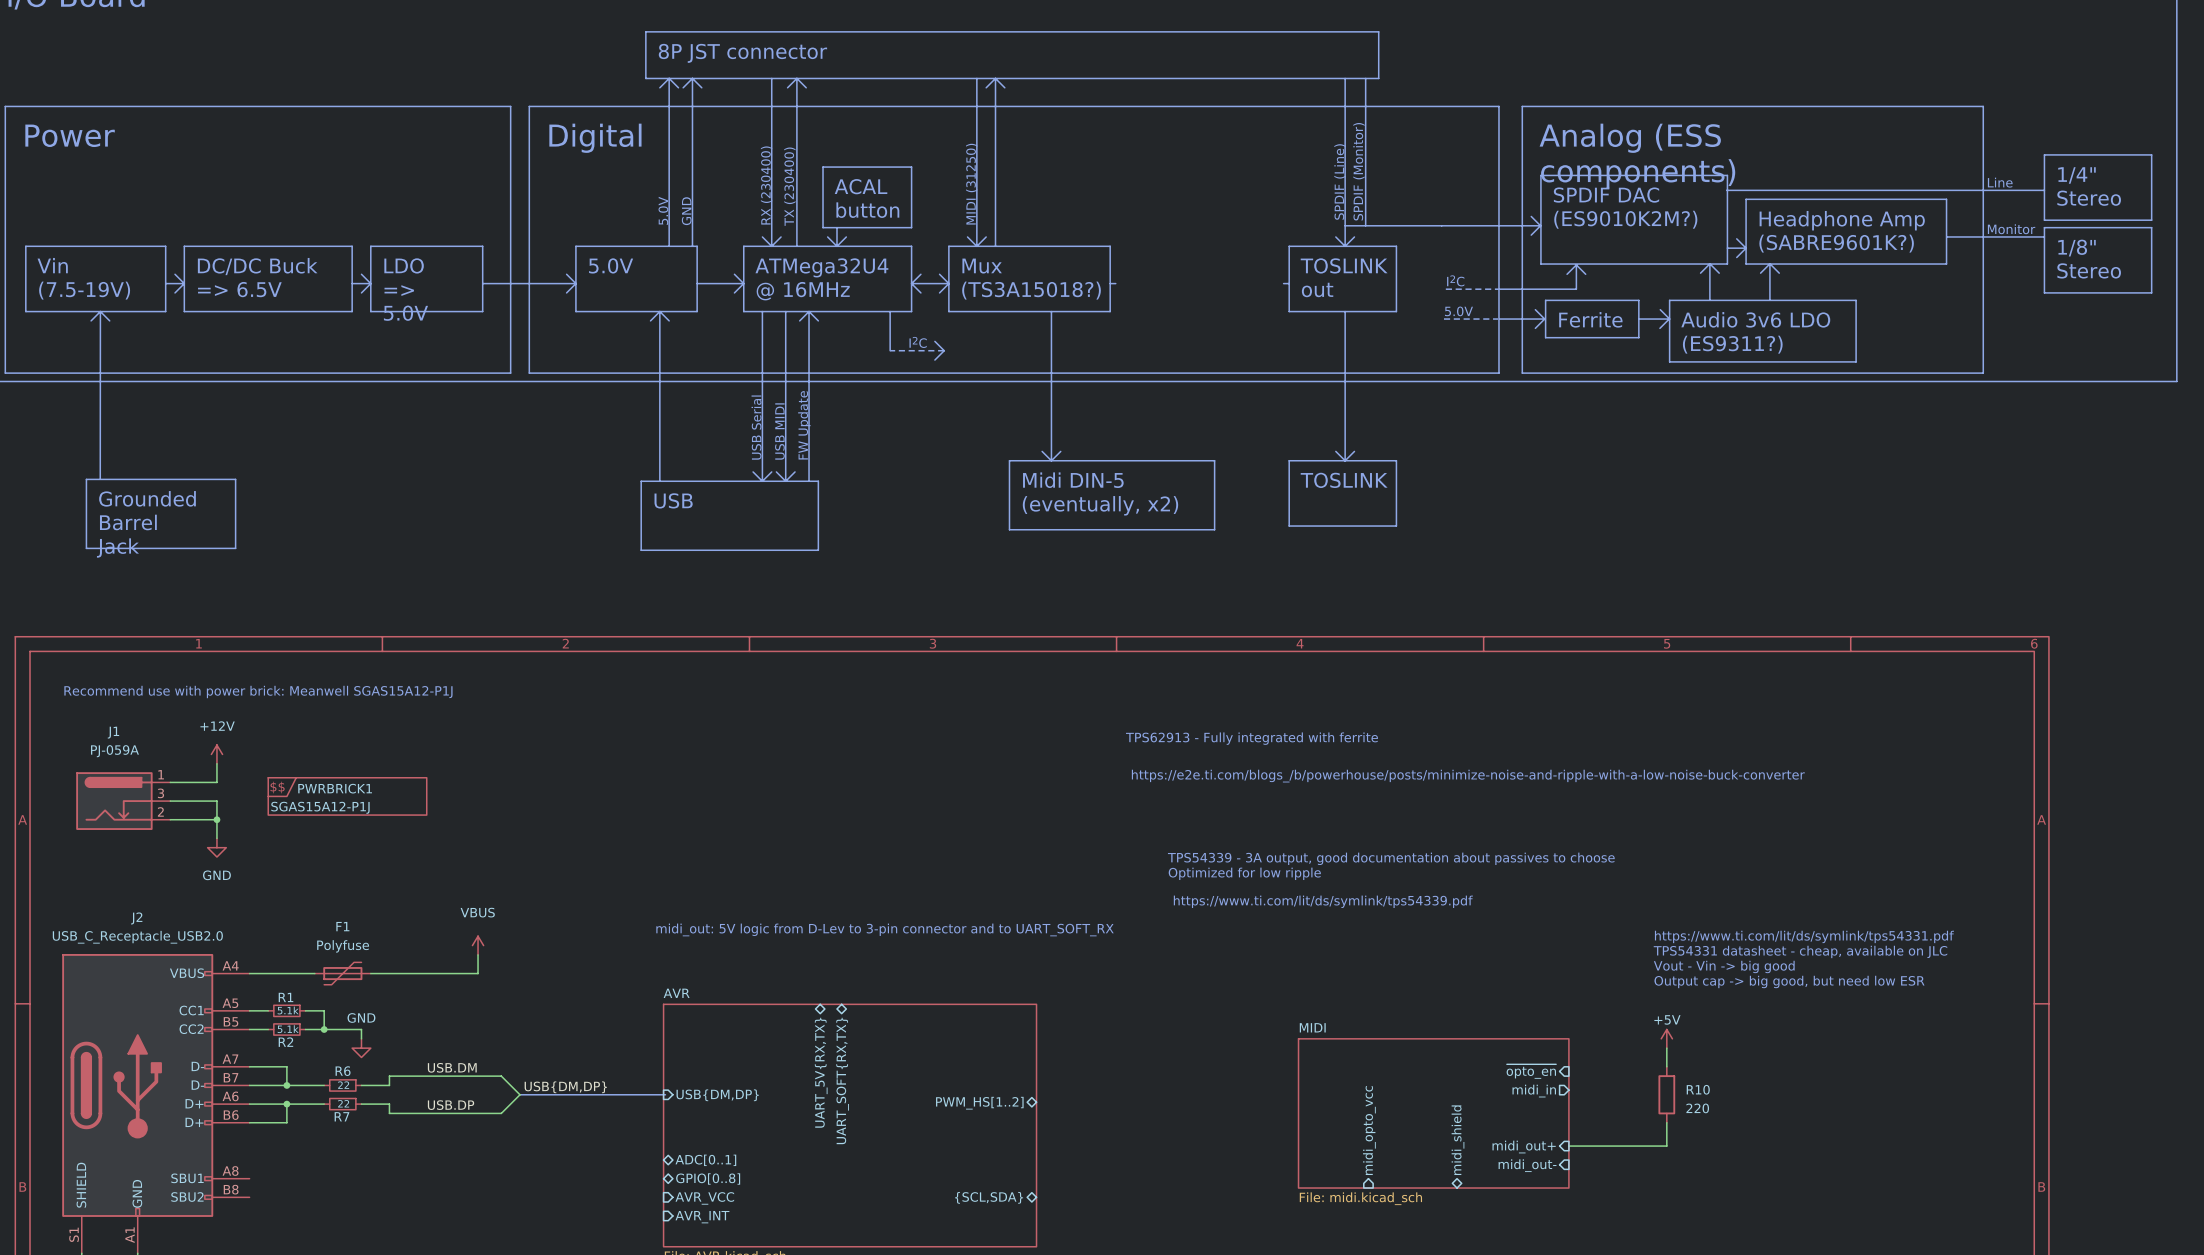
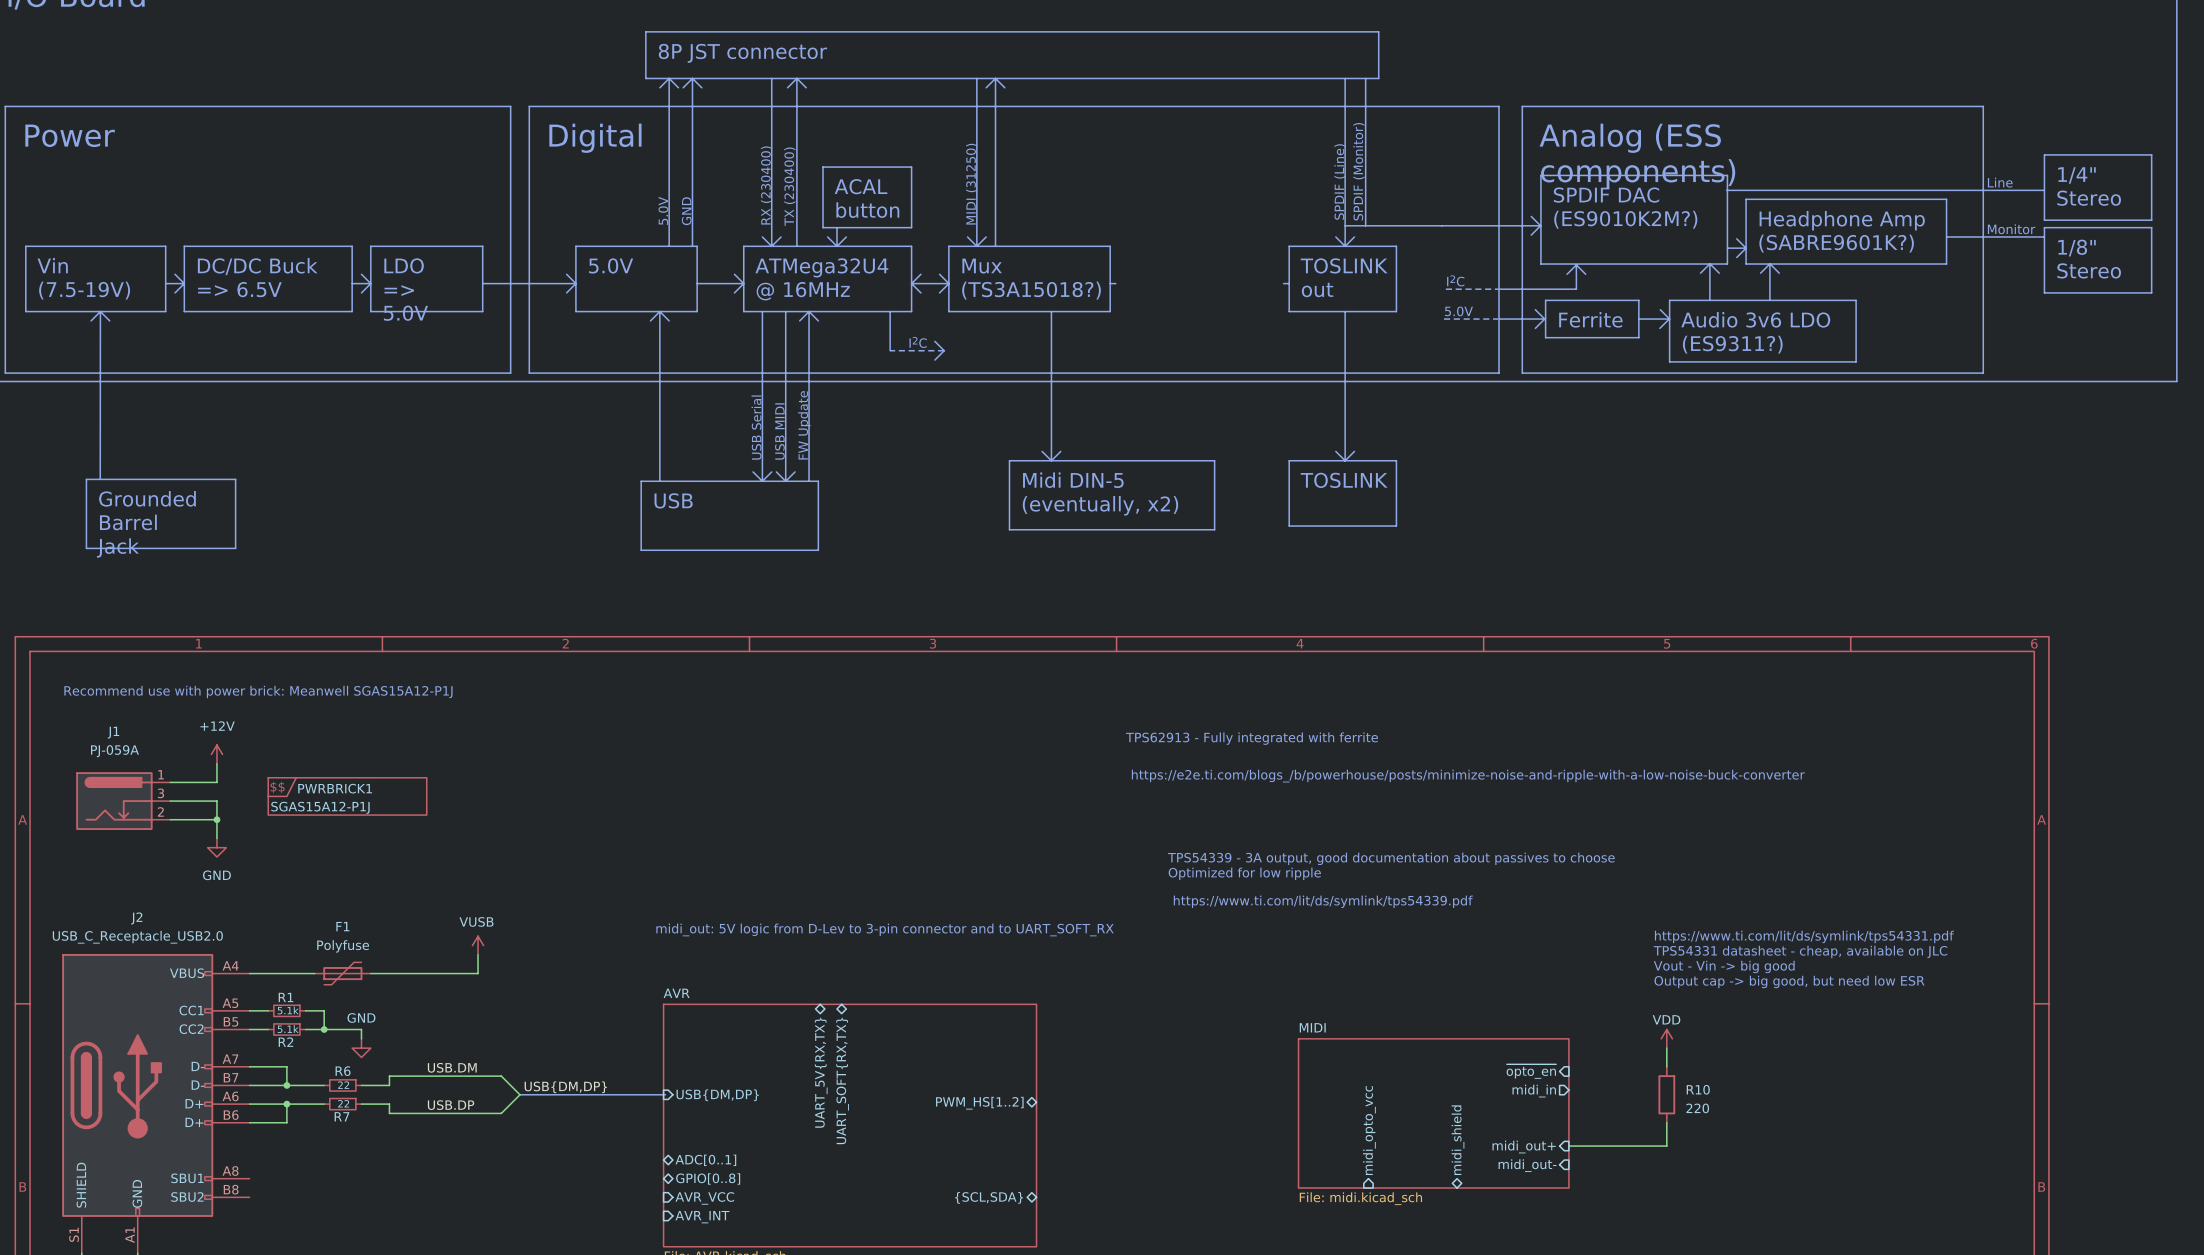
power symbol: VBUS (478, 945) -> VUSB (478, 945)
power symbol: +5V (1666, 1038) -> VDD (1666, 1038)

